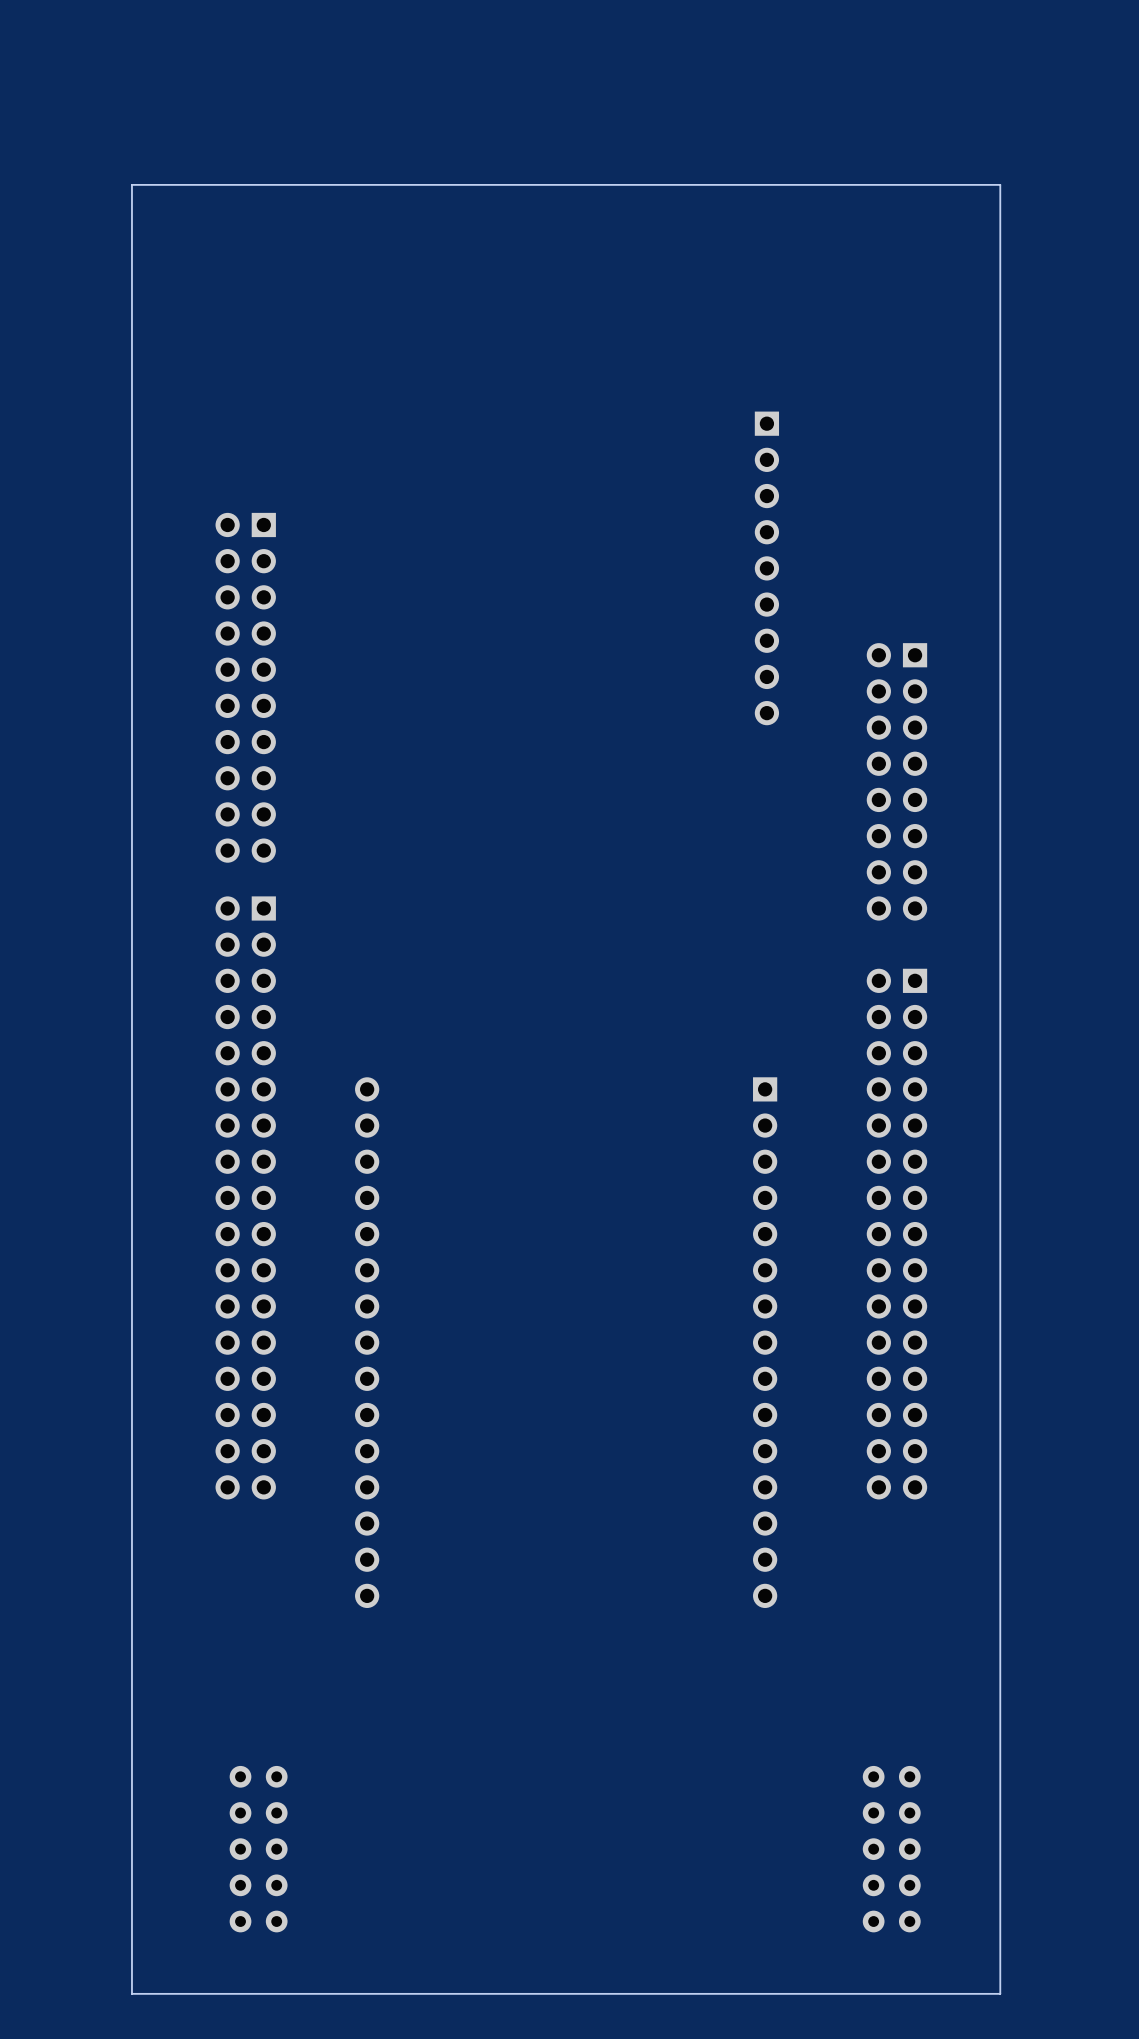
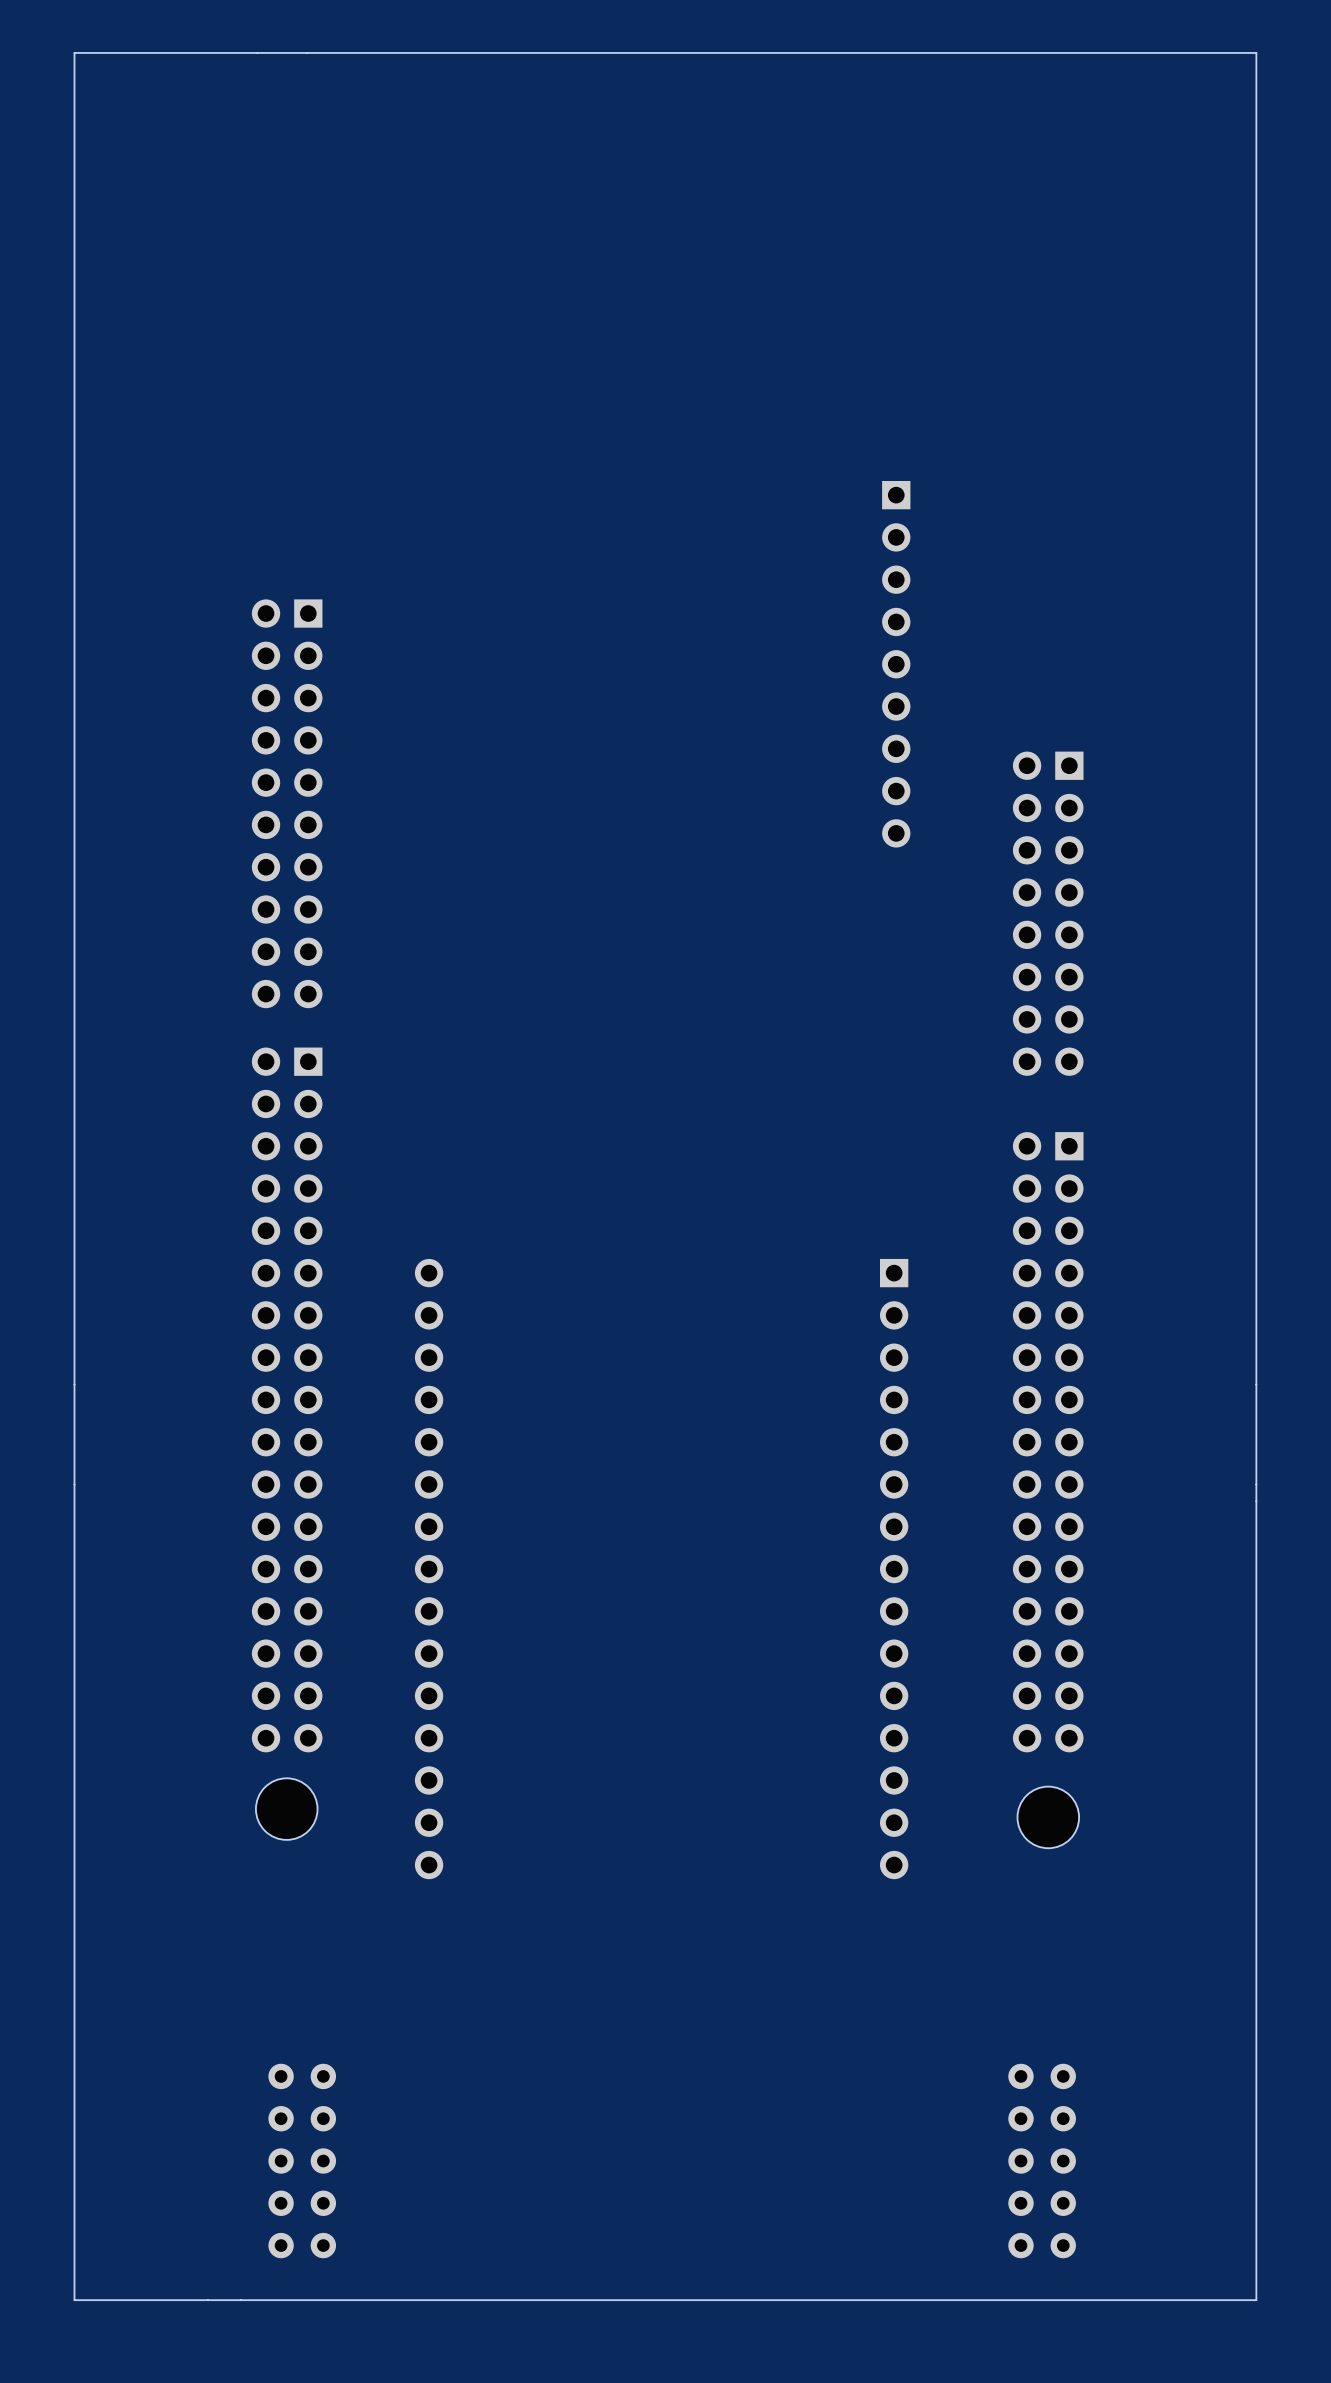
board edge: (1000, 184) (131, 184) (131, 1993) (1000, 1993) (1000, 184) -> (1256, 52) (1256, 2300) (74, 2300) (74, 52) (1256, 52)
part: none -> (286, 1809)
part: none -> (1048, 1817)

